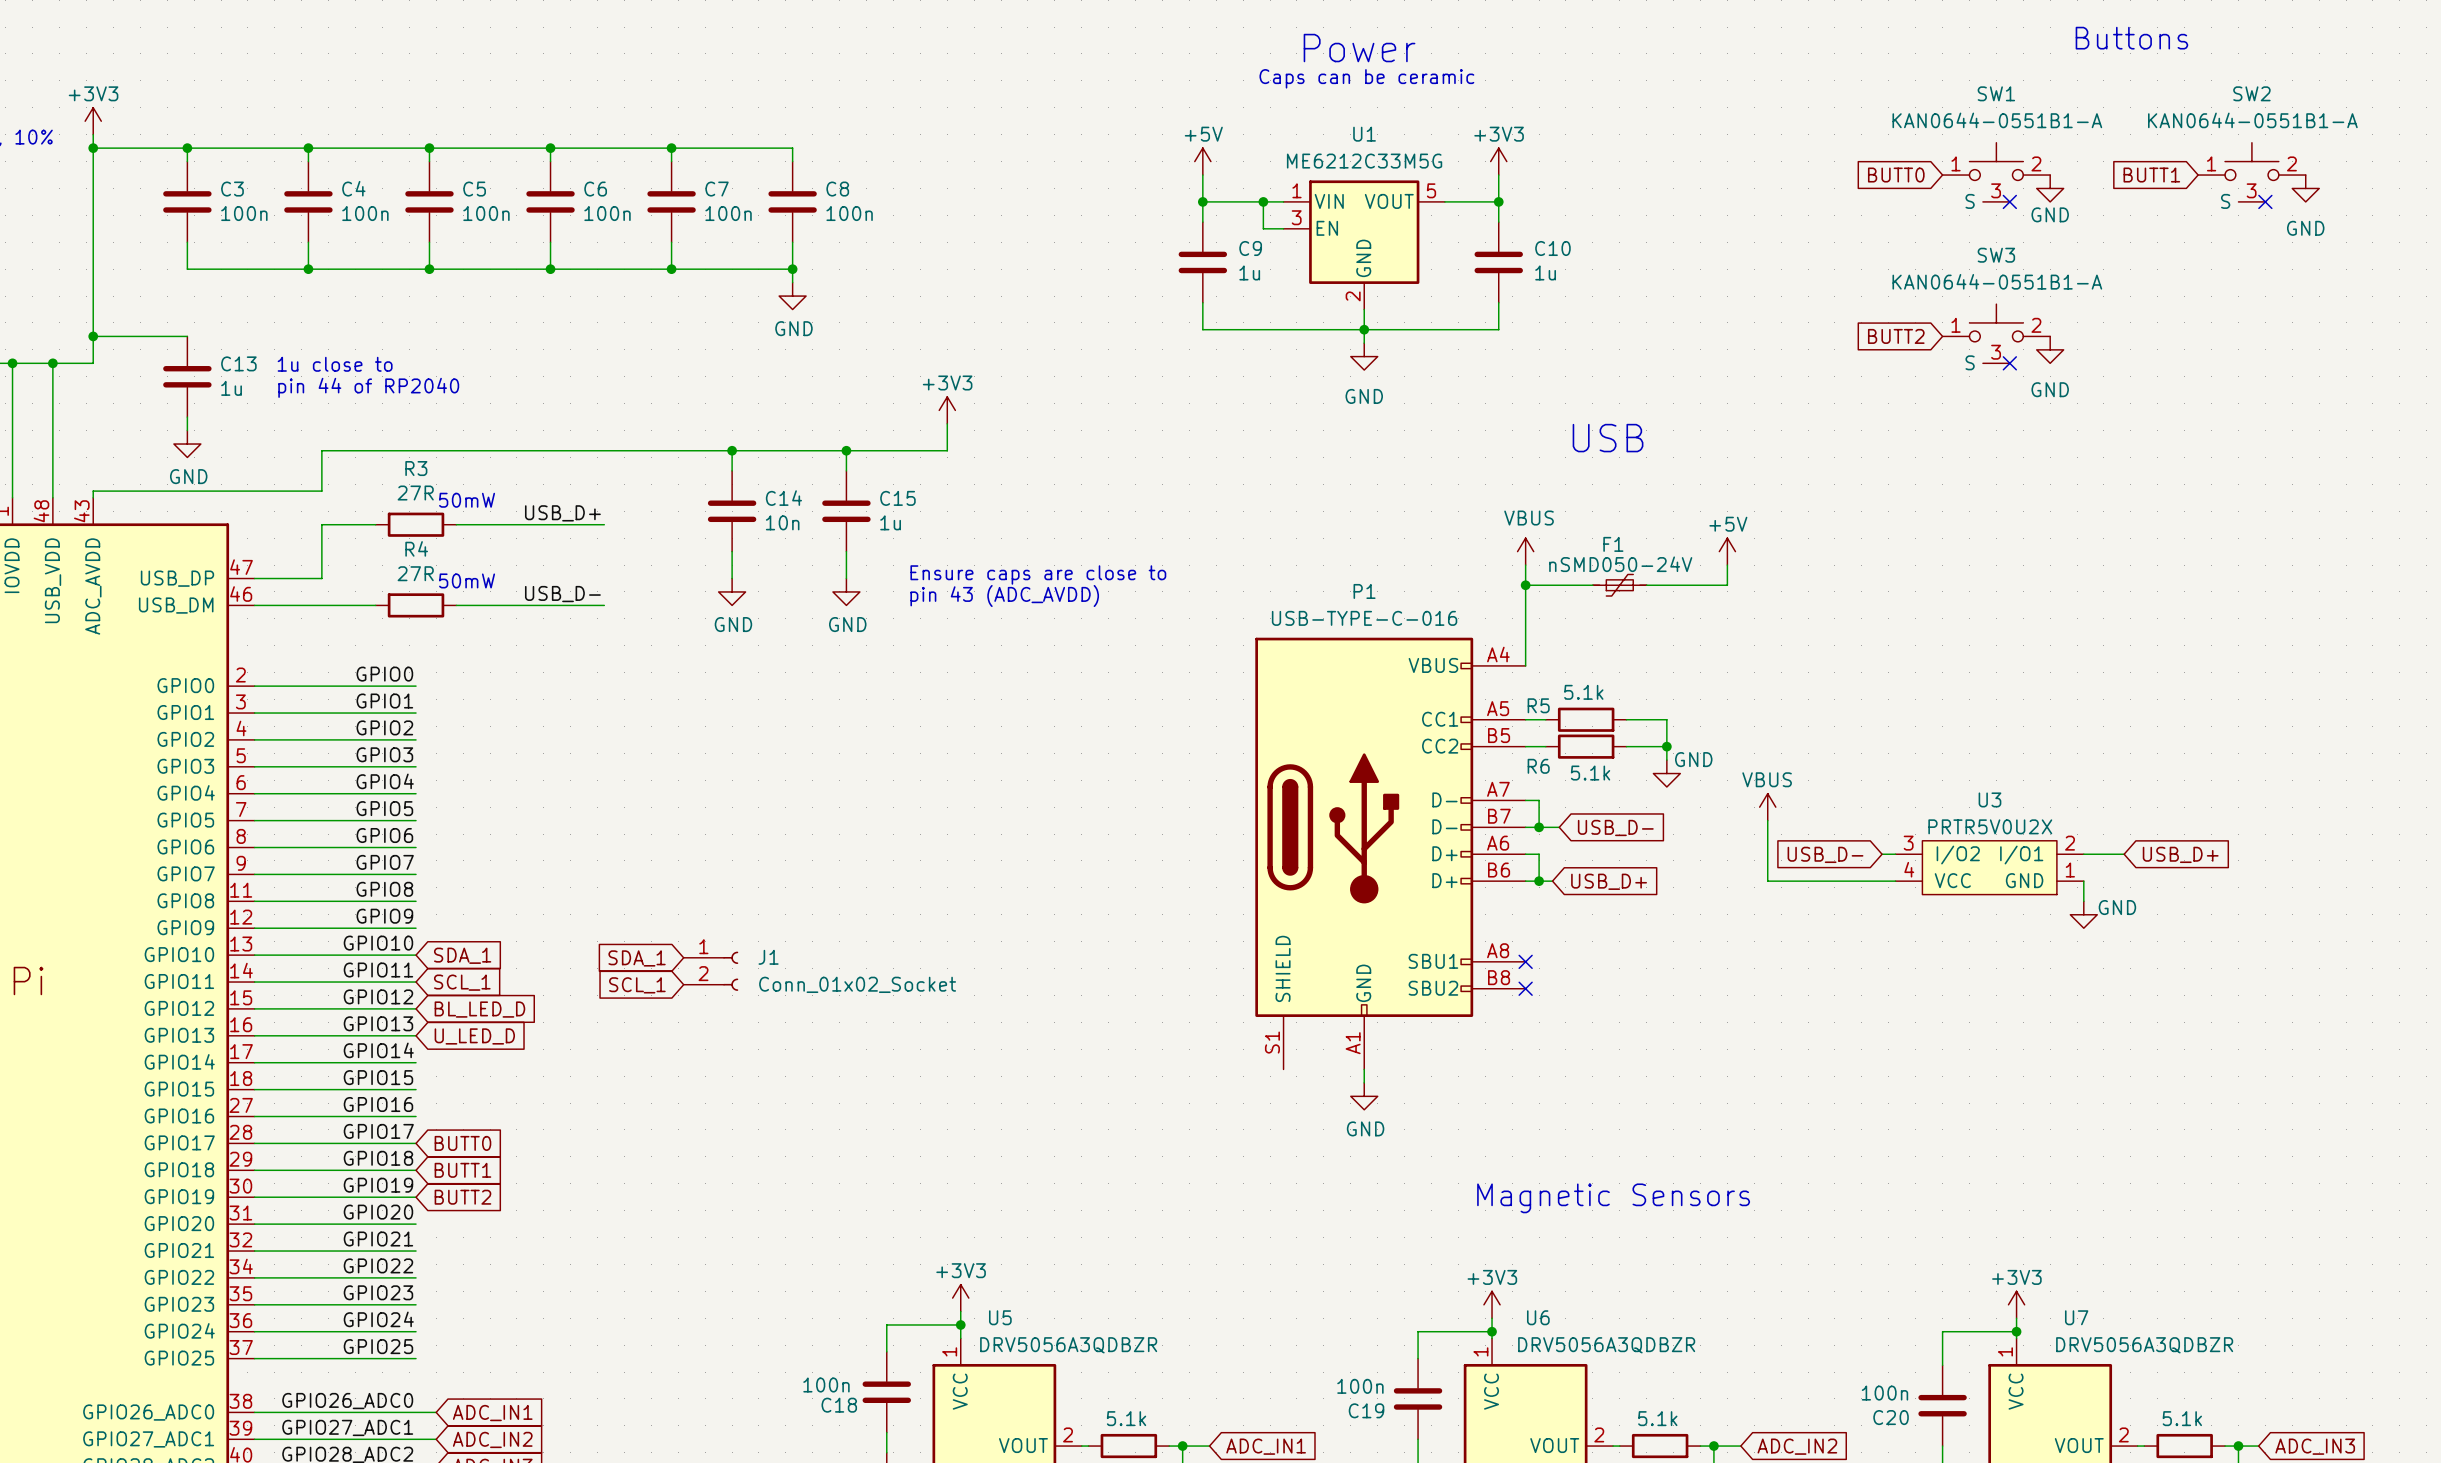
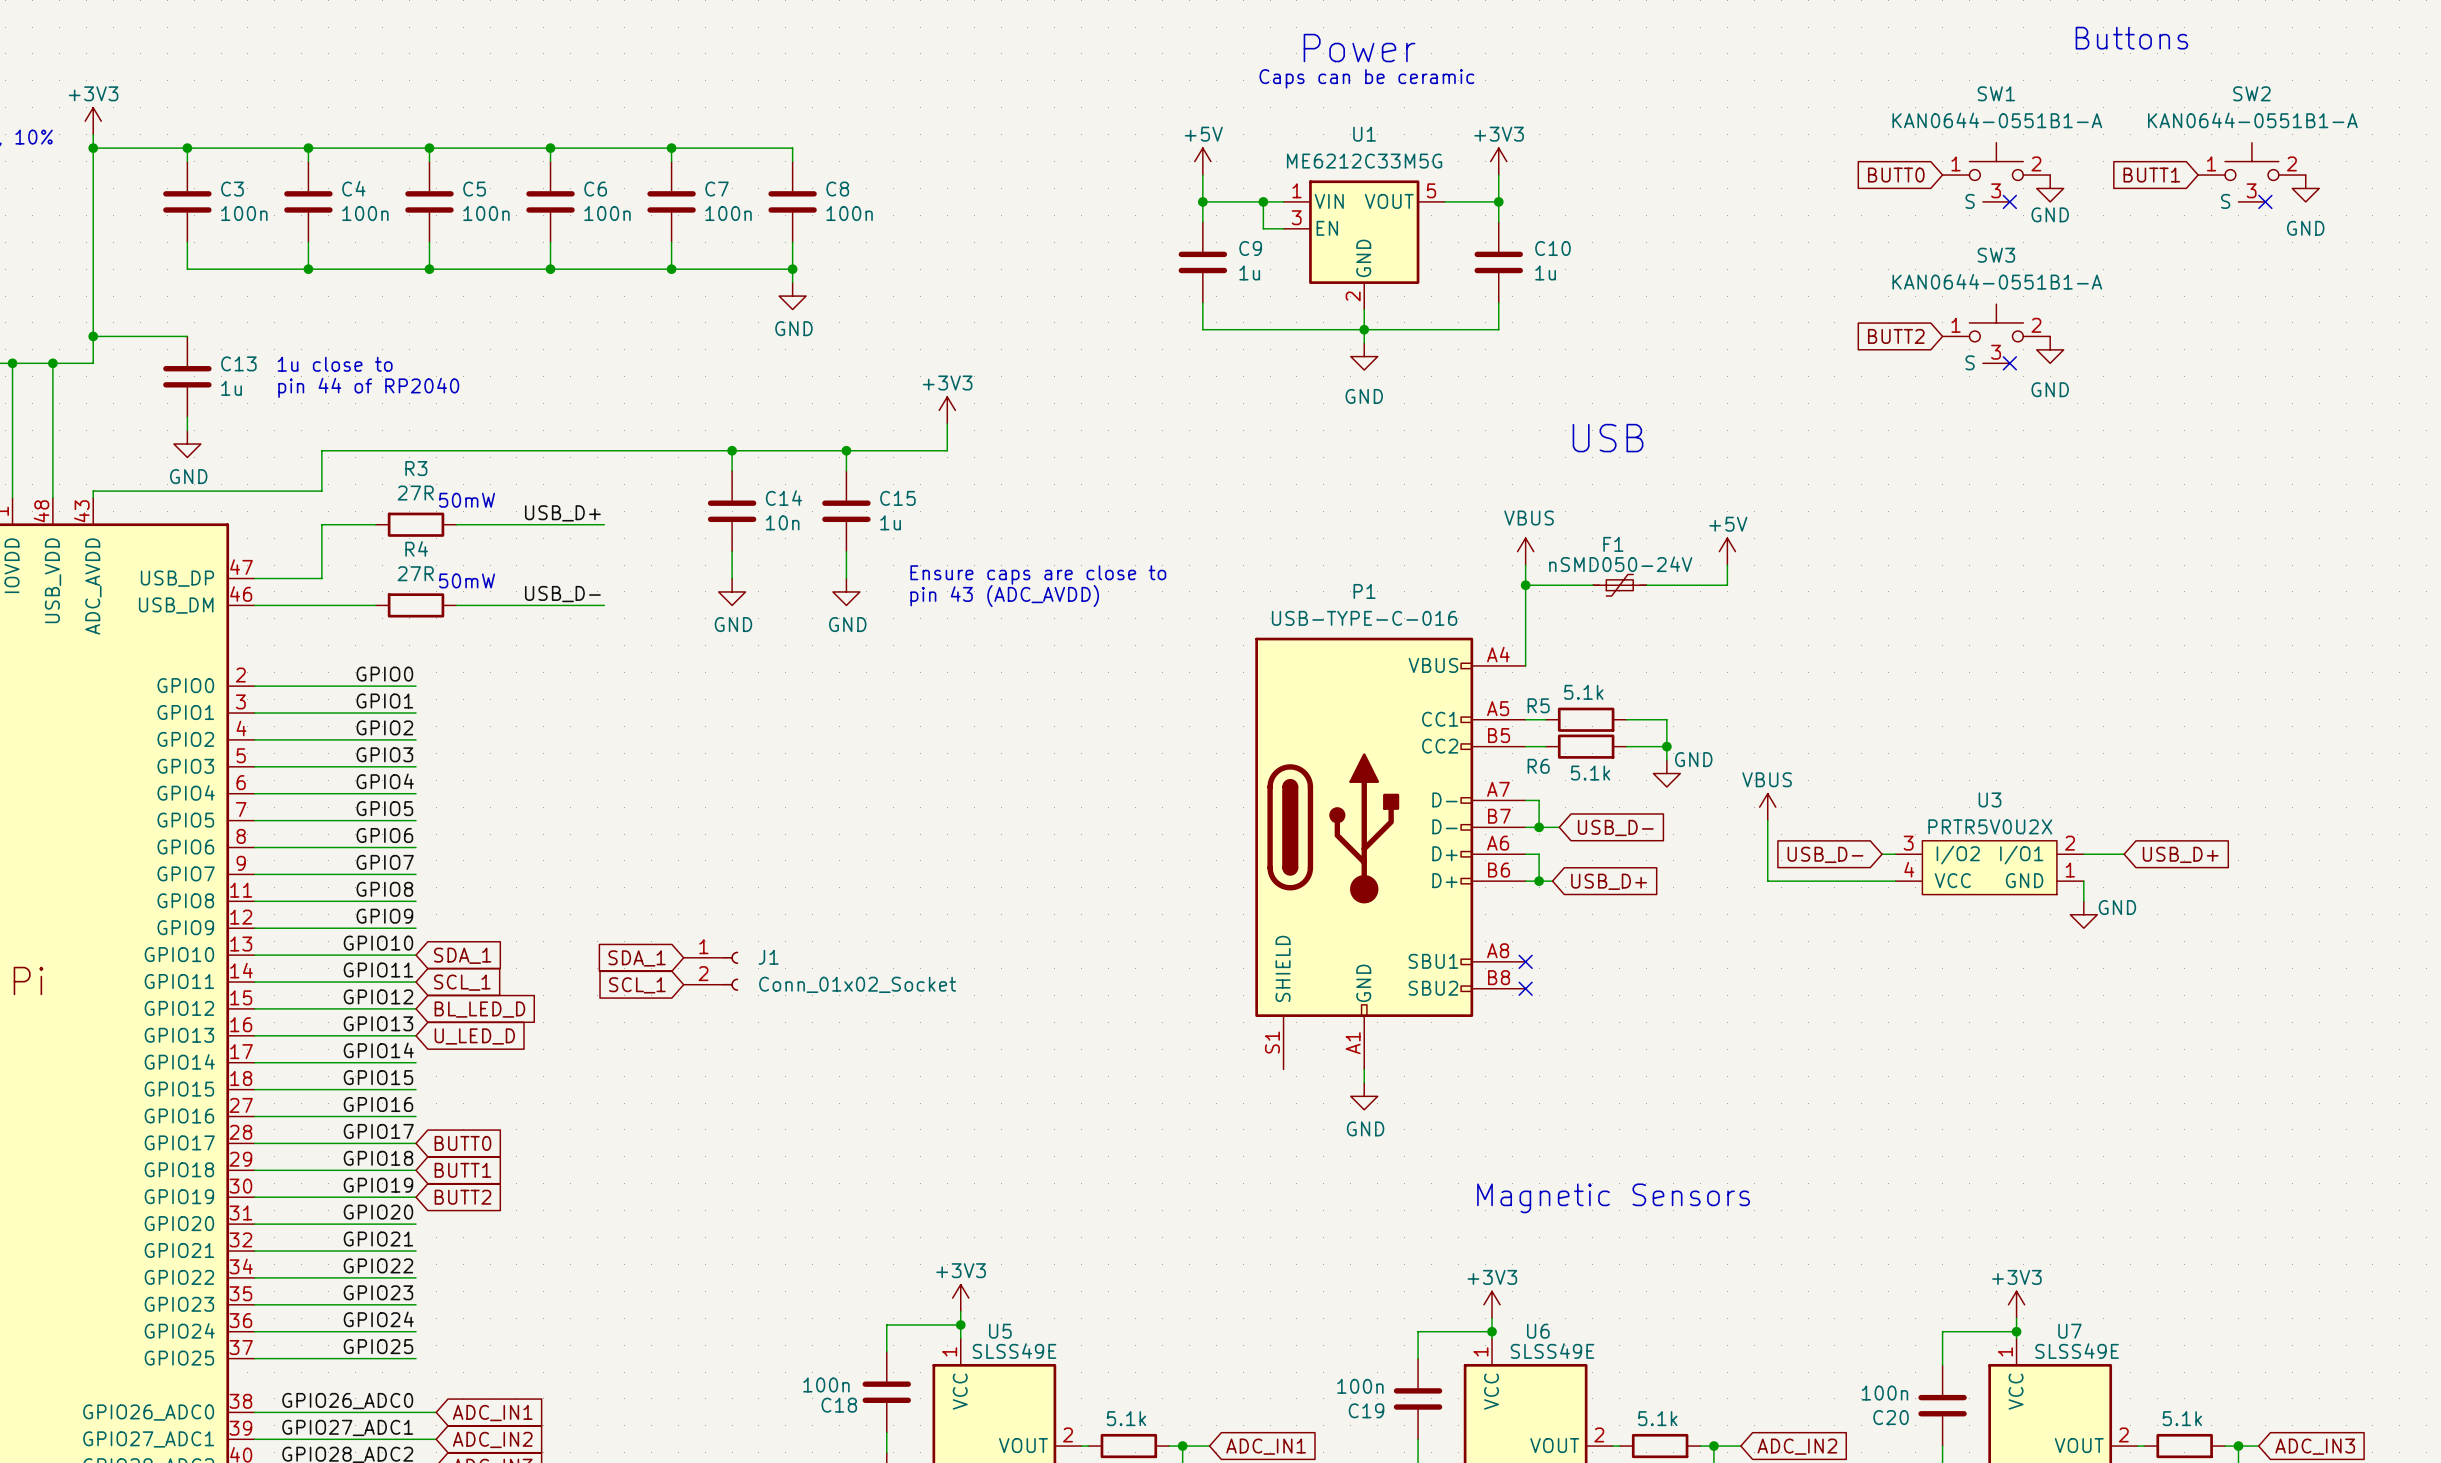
U5 name position: U5 (1000, 1317) -> U5 (1000, 1331)
U6 name position: U6 (1538, 1317) -> U6 (1538, 1331)
U7 name position: U7 (2076, 1317) -> U7 (2069, 1331)
U5 value: DRV5056A3QDBZR (1068, 1345) -> SLSS49E (1014, 1351)
U6 value: DRV5056A3QDBZR (1606, 1345) -> SLSS49E (1552, 1351)
U7 value: DRV5056A3QDBZR (2144, 1345) -> SLSS49E (2077, 1351)

